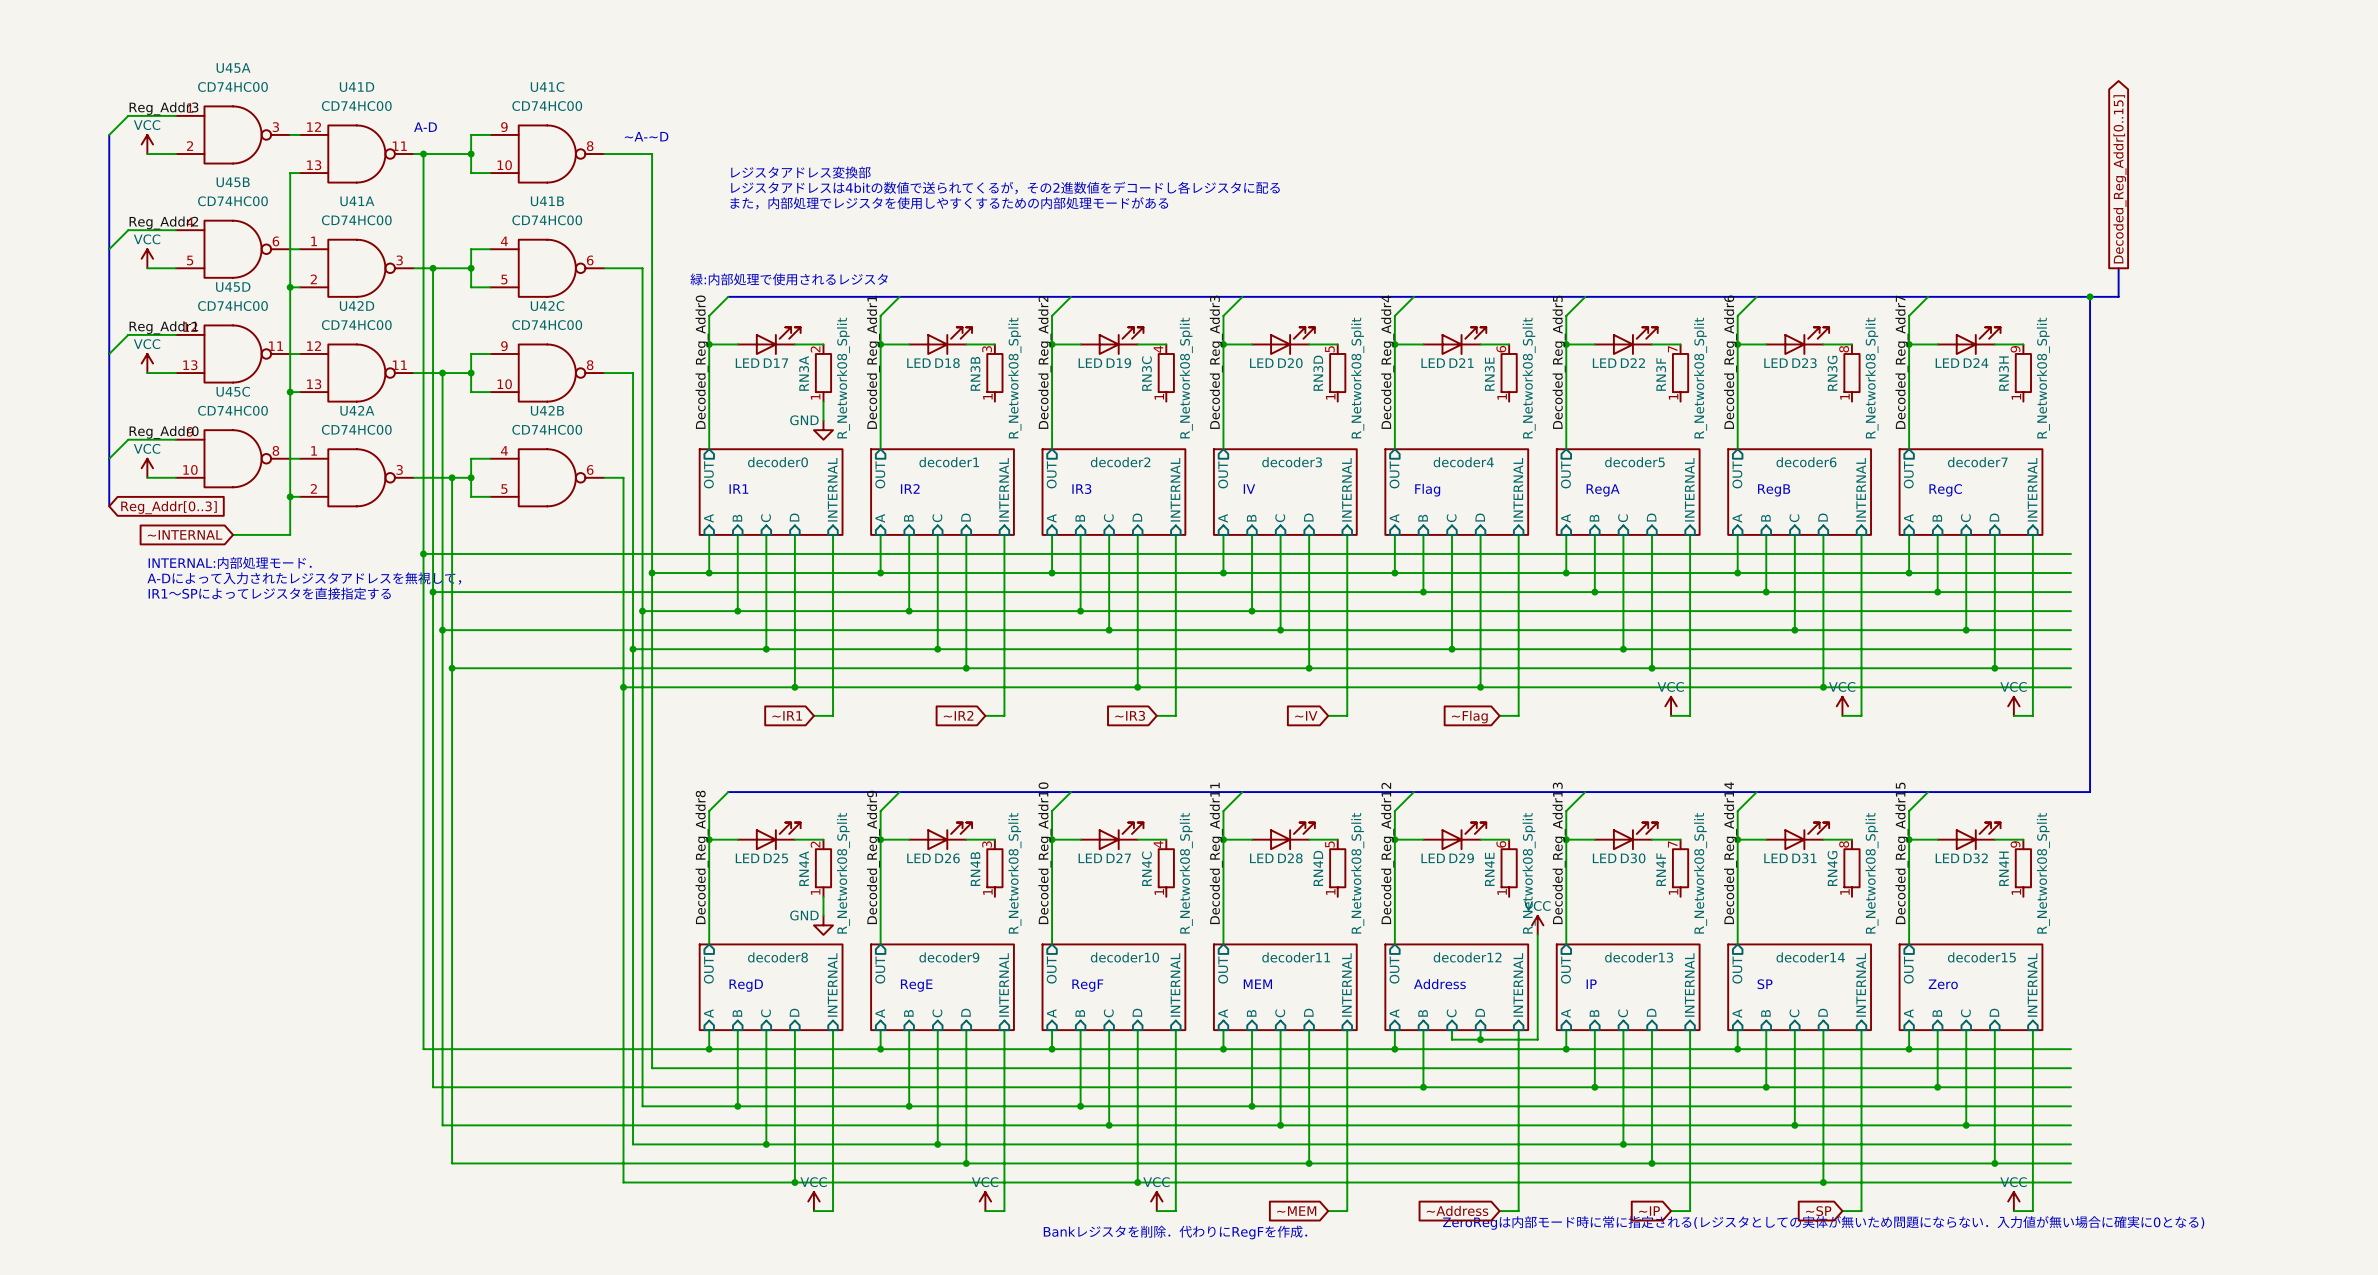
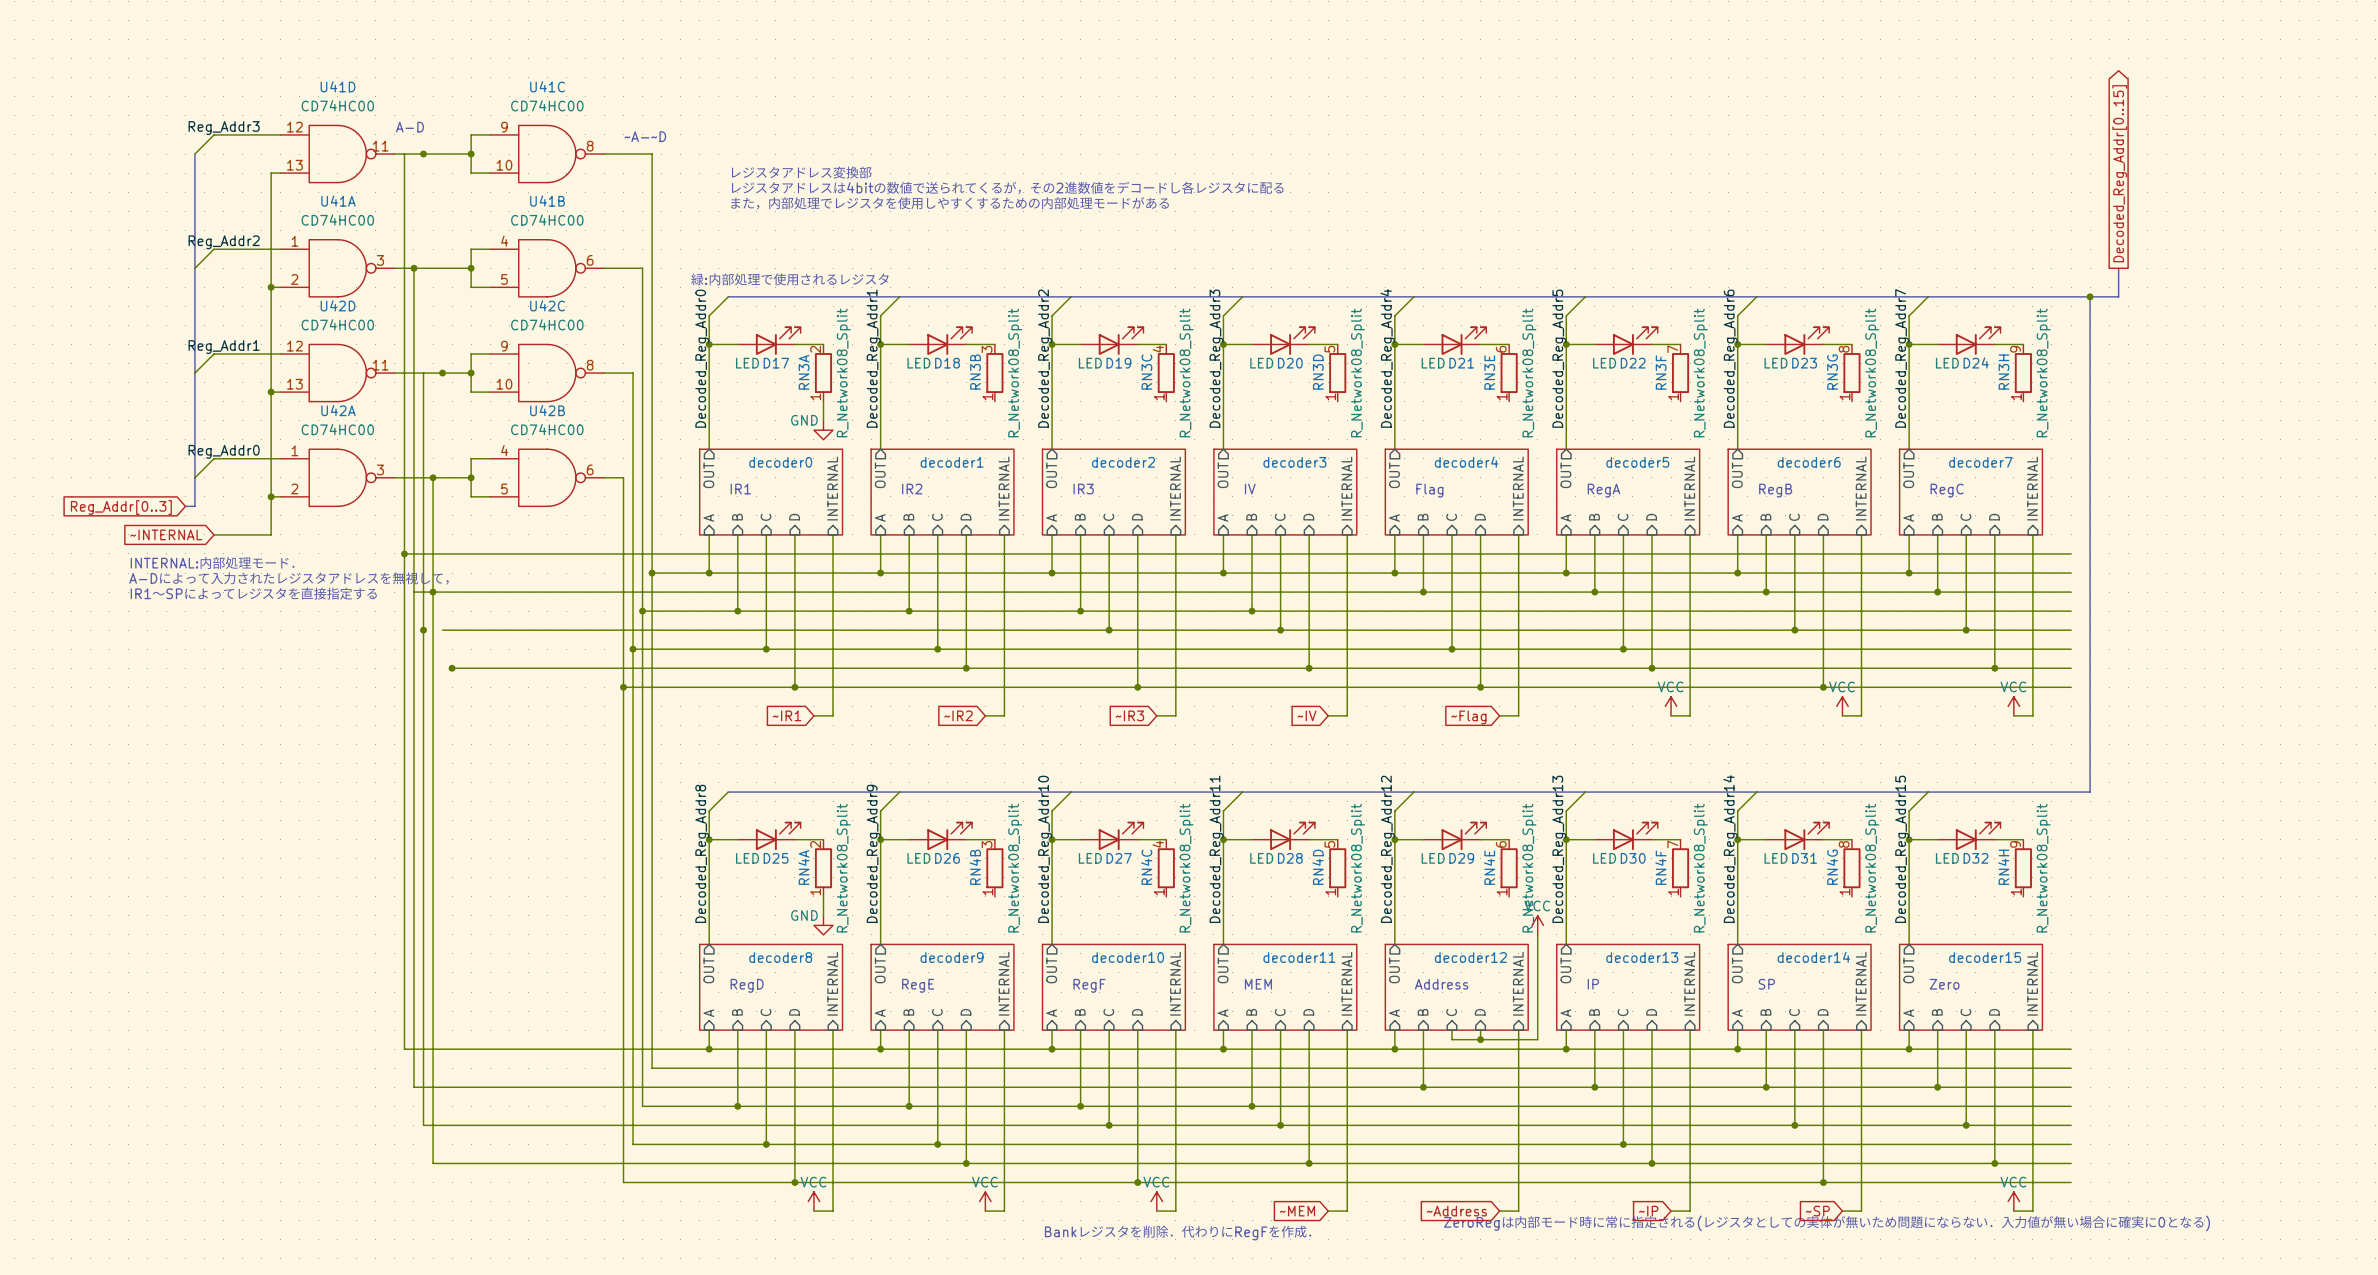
label position: Reg_Addr3 (163, 108) -> Reg_Addr3 (224, 128)
wire: (175, 115) (128, 115) (109, 134) -> none
text position: A-D (425, 127) -> A-D (409, 127)
bus: (109, 134) (109, 506) -> none
U45A: CD74HC00 (233, 134) -> none
wire: none -> (280, 134) (214, 134) (194, 154)
power symbol: VCC (147, 144) -> none
wire: (147, 154) (175, 154) -> none
bus: none -> (194, 154) (194, 506) (185, 506)
U41D position: (356, 154) -> (337, 154)
wire: (423, 154) (423, 373) -> none
wire: (299, 173) (290, 173) (290, 534) (271, 534) -> (280, 173) (271, 173) (271, 534)
label position: Reg_Addr2 (163, 223) -> Reg_Addr2 (224, 242)
wire: (175, 230) (128, 230) (109, 249) -> none
U45B: CD74HC00 (233, 249) -> none
wire: none -> (280, 249) (214, 249) (194, 268)
power symbol: VCC (147, 258) -> none
wire: (147, 268) (175, 268) -> none
U41A position: (356, 268) -> (337, 268)
wire: (433, 268) (433, 477) -> none
junction position: (433, 268) -> (413, 268)
junction position: (290, 287) -> (271, 287)
label position: Reg_Addr1 (163, 327) -> Reg_Addr1 (224, 347)
wire: (175, 334) (128, 334) (109, 353) -> none
U45D: CD74HC00 (233, 353) -> none
wire: none -> (280, 353) (214, 353) (194, 373)
power symbol: VCC (147, 363) -> none
wire: (147, 373) (175, 373) -> none
U42D position: (356, 373) -> (337, 373)
wire: (442, 373) (442, 1125) -> (404, 154) (404, 1049) (423, 1049) (423, 1125) (442, 1125)
junction position: (290, 392) -> (271, 392)
label position: Reg_Addr0 (164, 432) -> Reg_Addr0 (224, 451)
wire: (175, 439) (128, 439) (109, 458) -> none
U45C: CD74HC00 (233, 458) -> none
wire: none -> (280, 458) (214, 458) (194, 477)
power symbol: VCC (147, 468) -> none
wire: (147, 477) (175, 477) -> none
U42A position: (356, 477) -> (337, 477)
wire: (452, 477) (452, 1163) -> (394, 268) (413, 268) (413, 1087) (433, 1087) (433, 1163) (452, 1163)
junction position: (452, 477) -> (433, 477)
junction position: (290, 496) -> (271, 496)
global label rotation: 0° (169, 507) -> 180° (121, 507)
global label position: ~INTERNAL (185, 534) -> ~INTERNAL (166, 534)
wire: none -> (214, 534) (233, 534)
wire: none -> (404, 553) (423, 553)
junction position: (423, 553) -> (404, 553)
text position: INTERNAL:内部処理モード． (230, 562) -> INTERNAL:内部処理モード． (212, 562)
text position: A-Dによって入力されたレジスタアドレスを無視して， (304, 578) -> A-Dによって入力されたレジスタアドレスを無視して， (289, 578)
wire: none -> (413, 592) (433, 592)
text position: IR1～SPによってレジスタを直接指定する (269, 593) -> IR1～SPによってレジスタを直接指定する (254, 593)
junction position: (442, 630) -> (423, 630)

